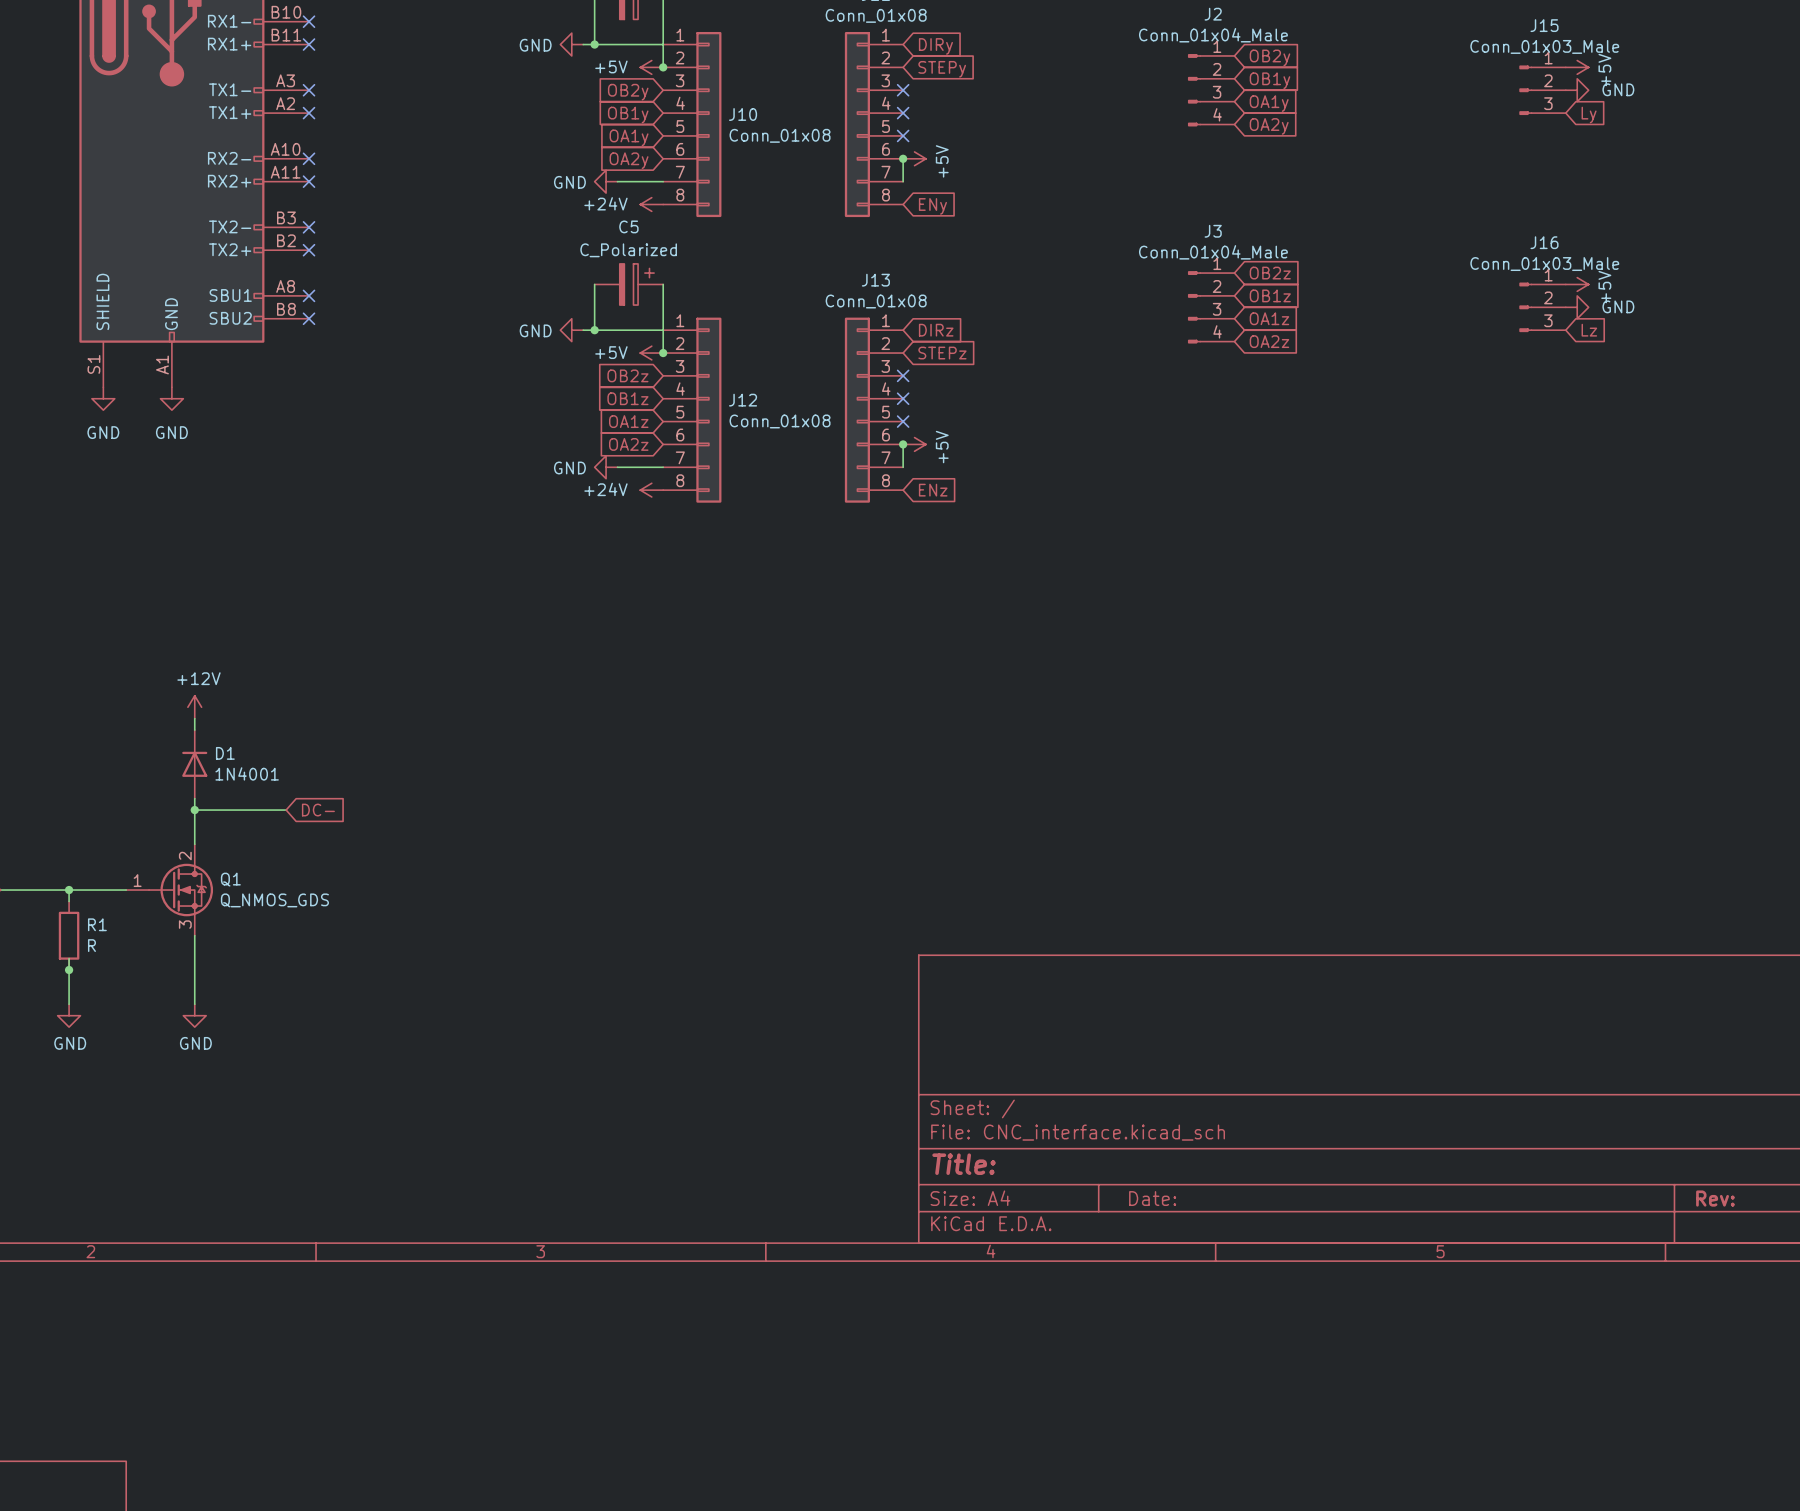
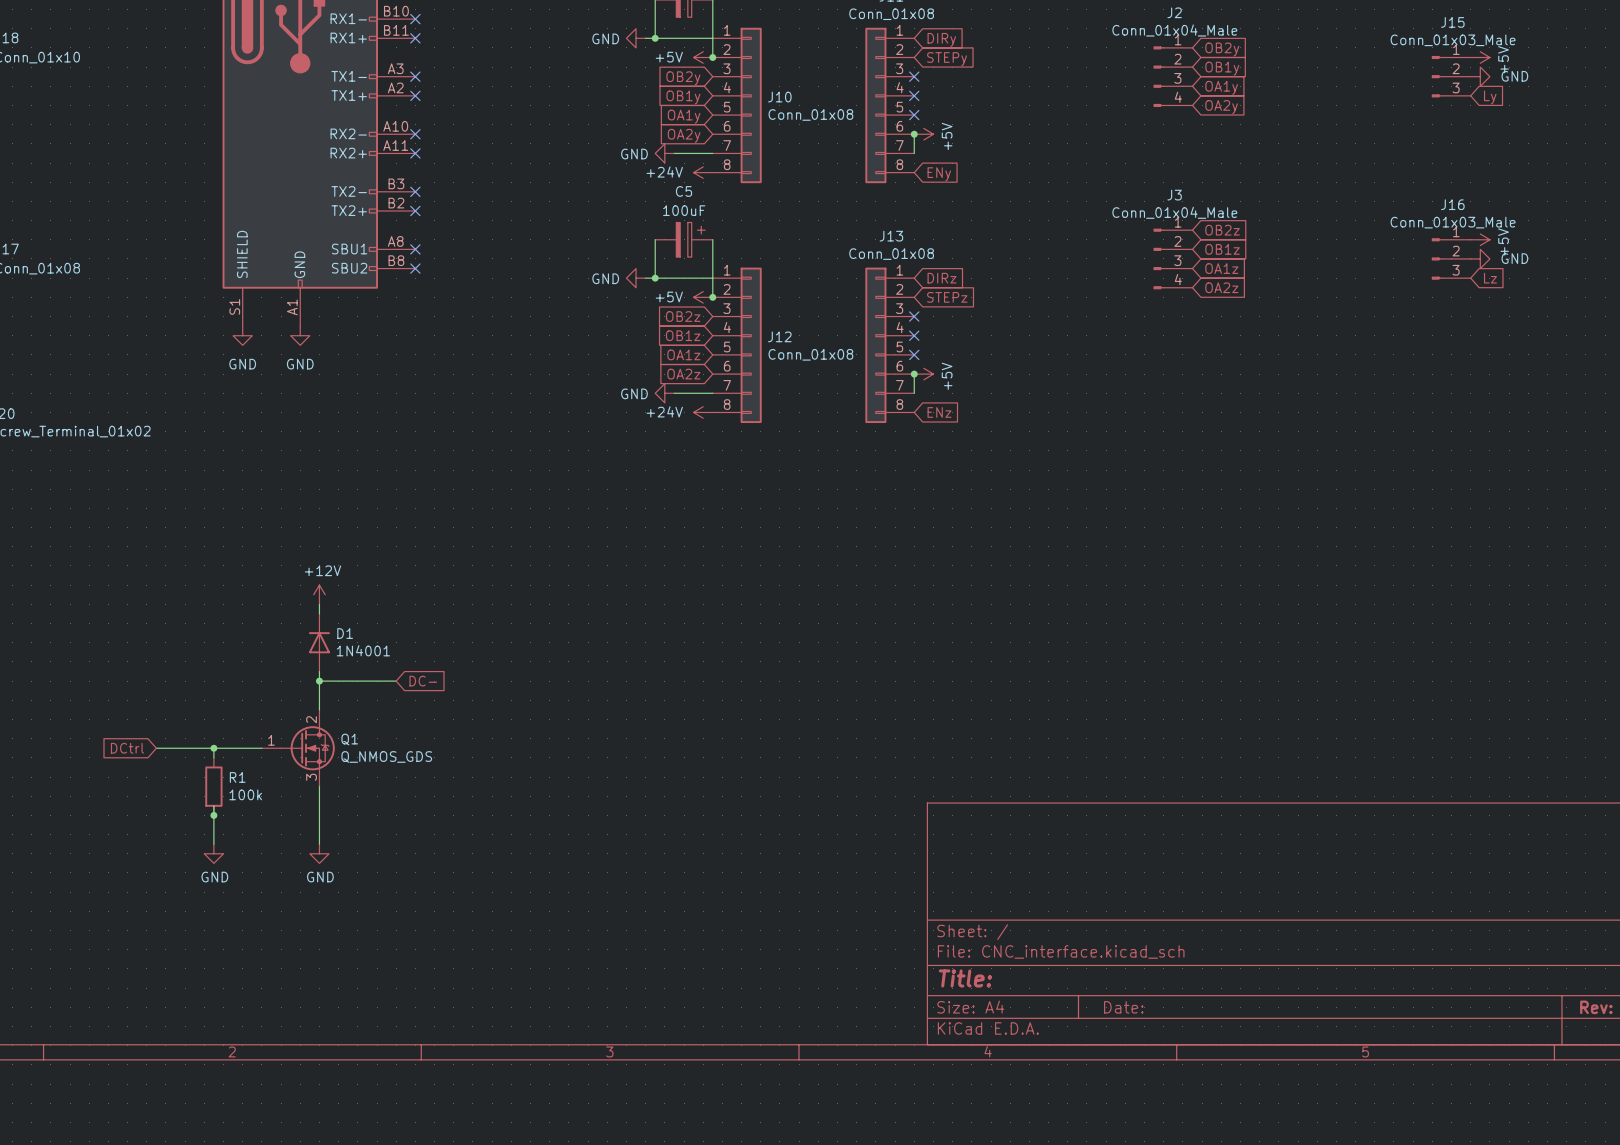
C5 value: C_Polarized (628, 250) -> 100uF (684, 210)
R1 value: R (91, 945) -> 100k (245, 794)

